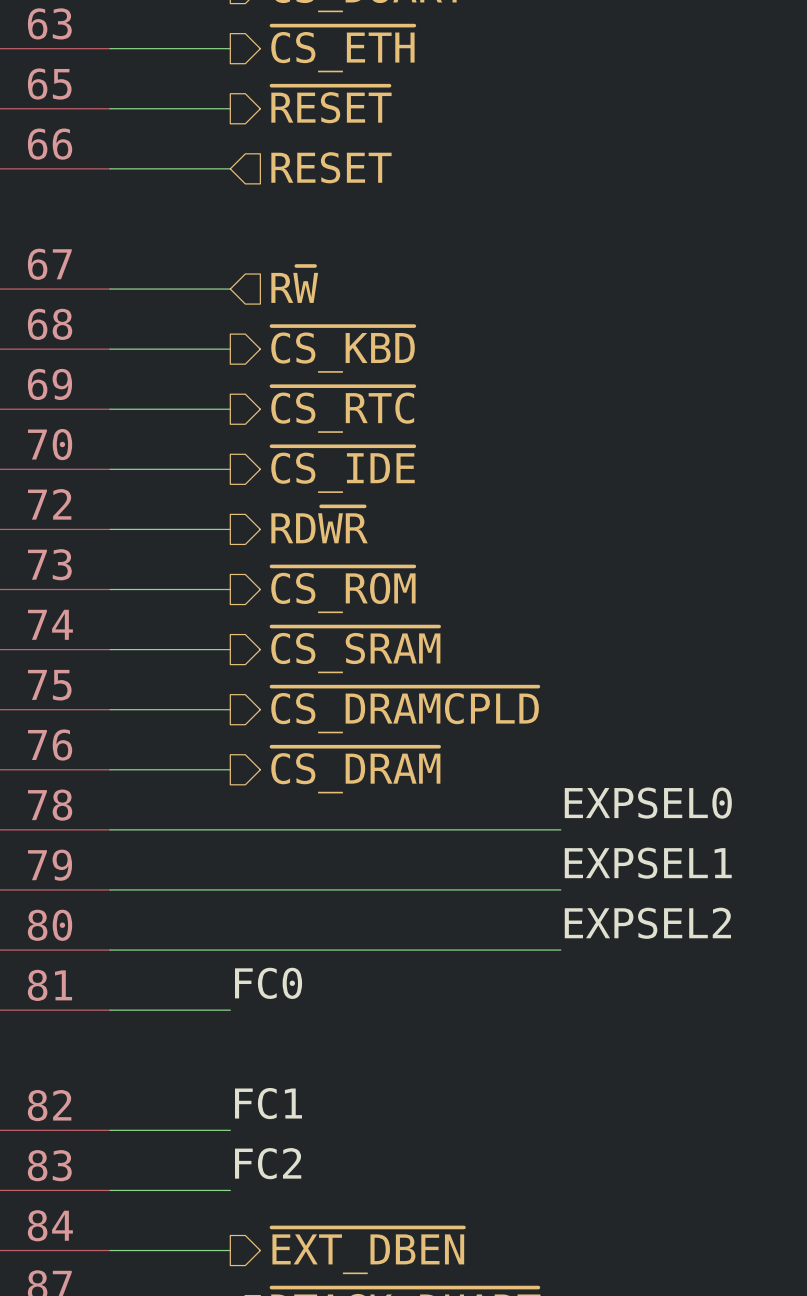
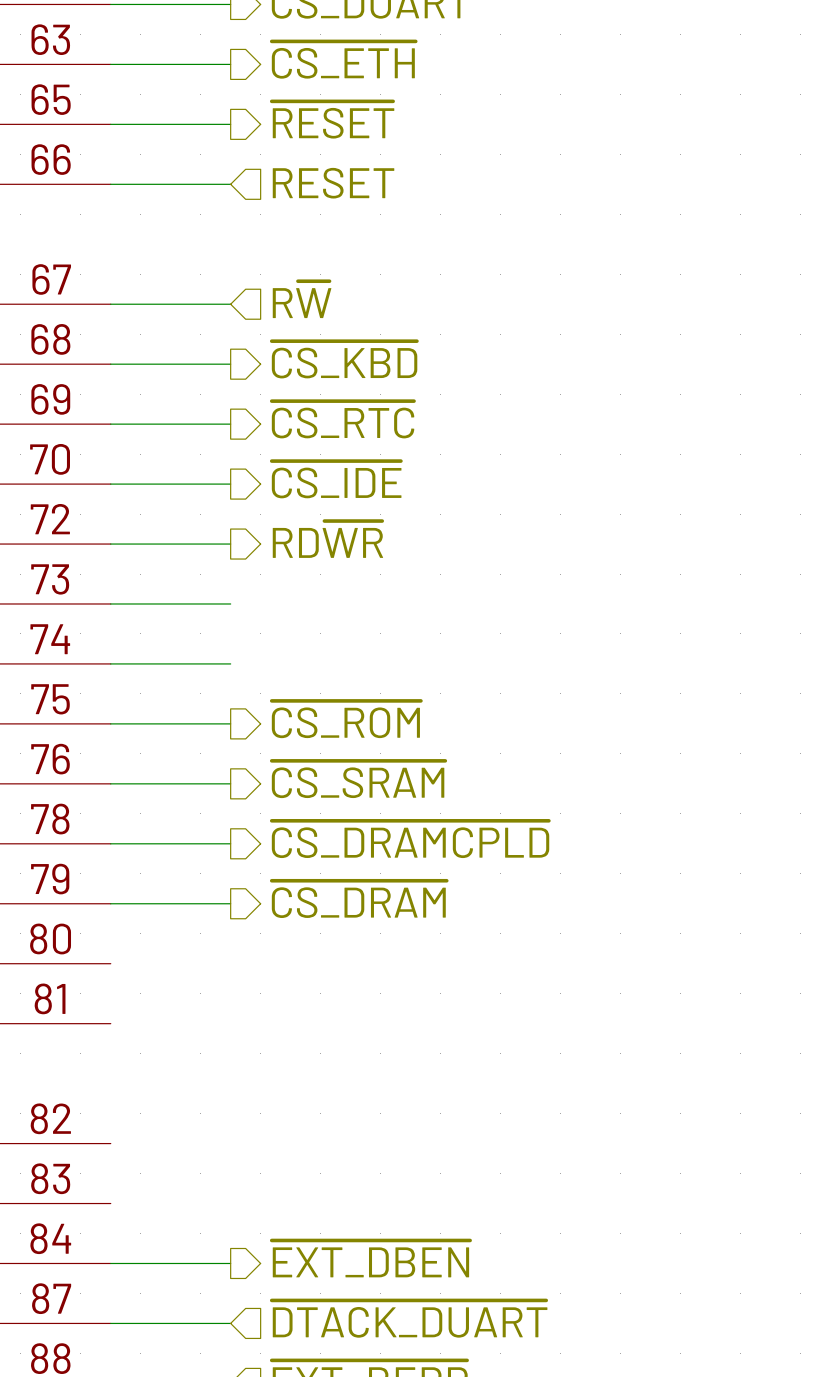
hierarchical label: ~{CS_ROM} (343, 589) -> none
hierarchical label: ~{CS_SRAM} (355, 649) -> none
hierarchical label: ~{CS_DRAMCPLD} (405, 709) -> ~{CS_ROM} (346, 719)
hierarchical label: ~{CS_DRAM} (355, 770) -> ~{CS_SRAM} (358, 779)
label: EXPSEL0 (648, 803) -> none
wire: (230, 829) (560, 829) -> none
hierarchical label: none -> ~{CS_DRAMCPLD} (410, 839)
label: EXPSEL1 (648, 863) -> none
wire: (230, 889) (560, 889) -> none
hierarchical label: none -> ~{CS_DRAM} (359, 899)
label: EXPSEL2 (647, 923) -> none
wire: (110, 950) (560, 950) -> none
label: FC0 (268, 983) -> none
wire: (110, 1010) (230, 1010) -> none
label: FC1 (268, 1103) -> none
wire: (110, 1130) (230, 1130) -> none
label: FC2 (268, 1163) -> none
wire: (110, 1190) (230, 1190) -> none

